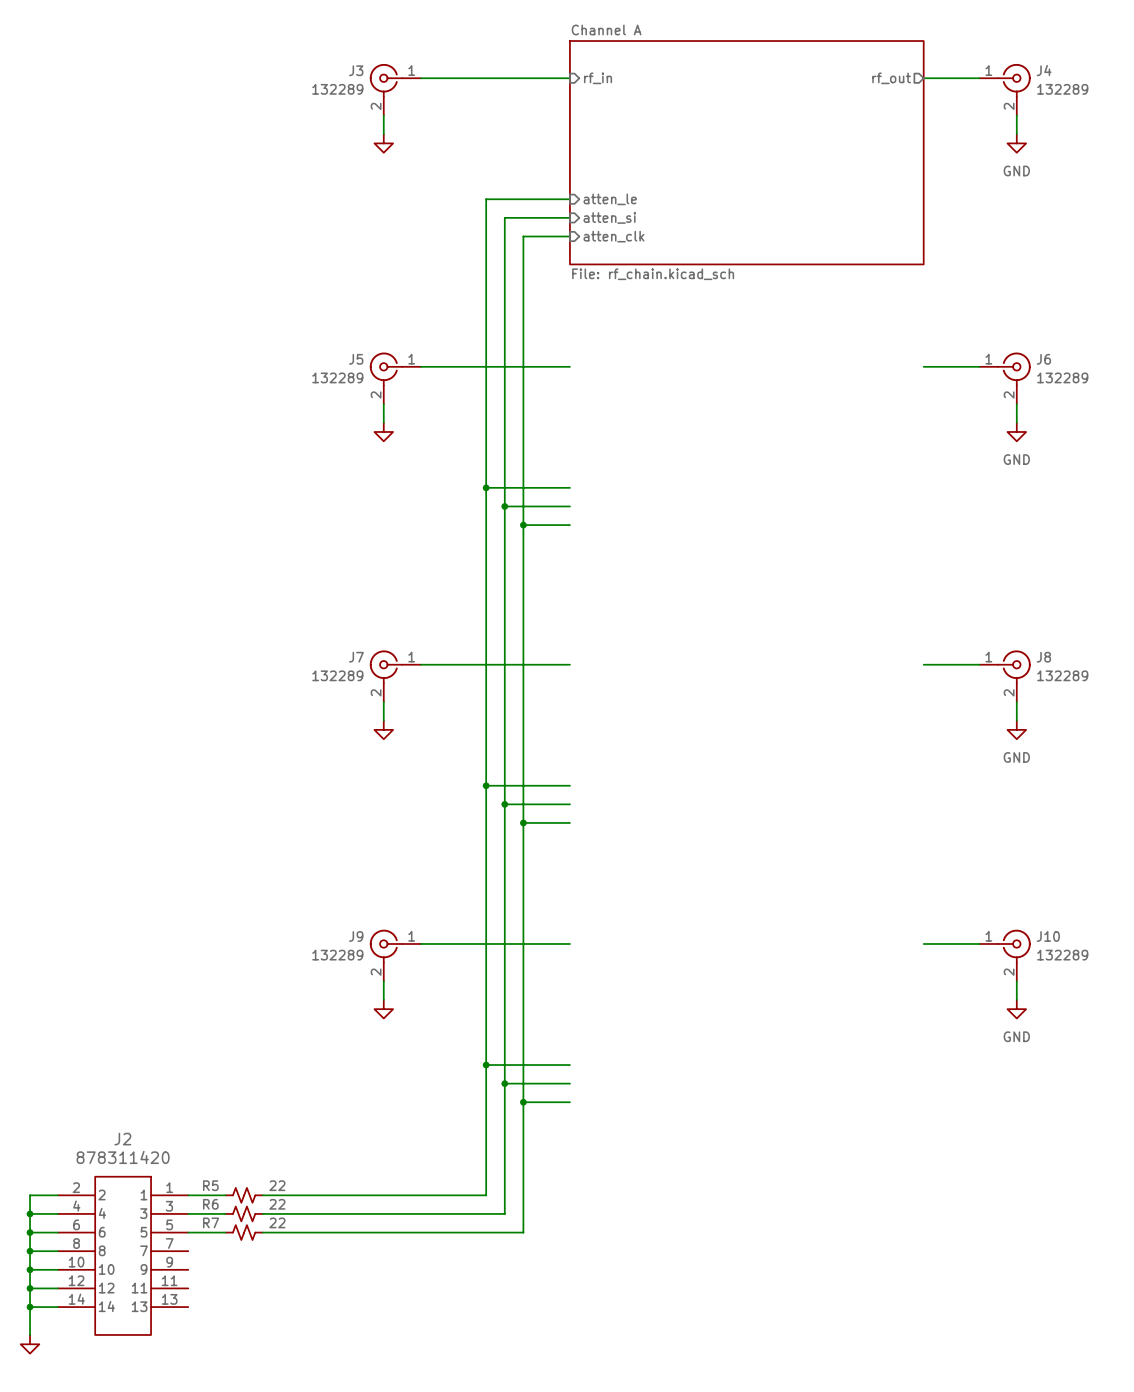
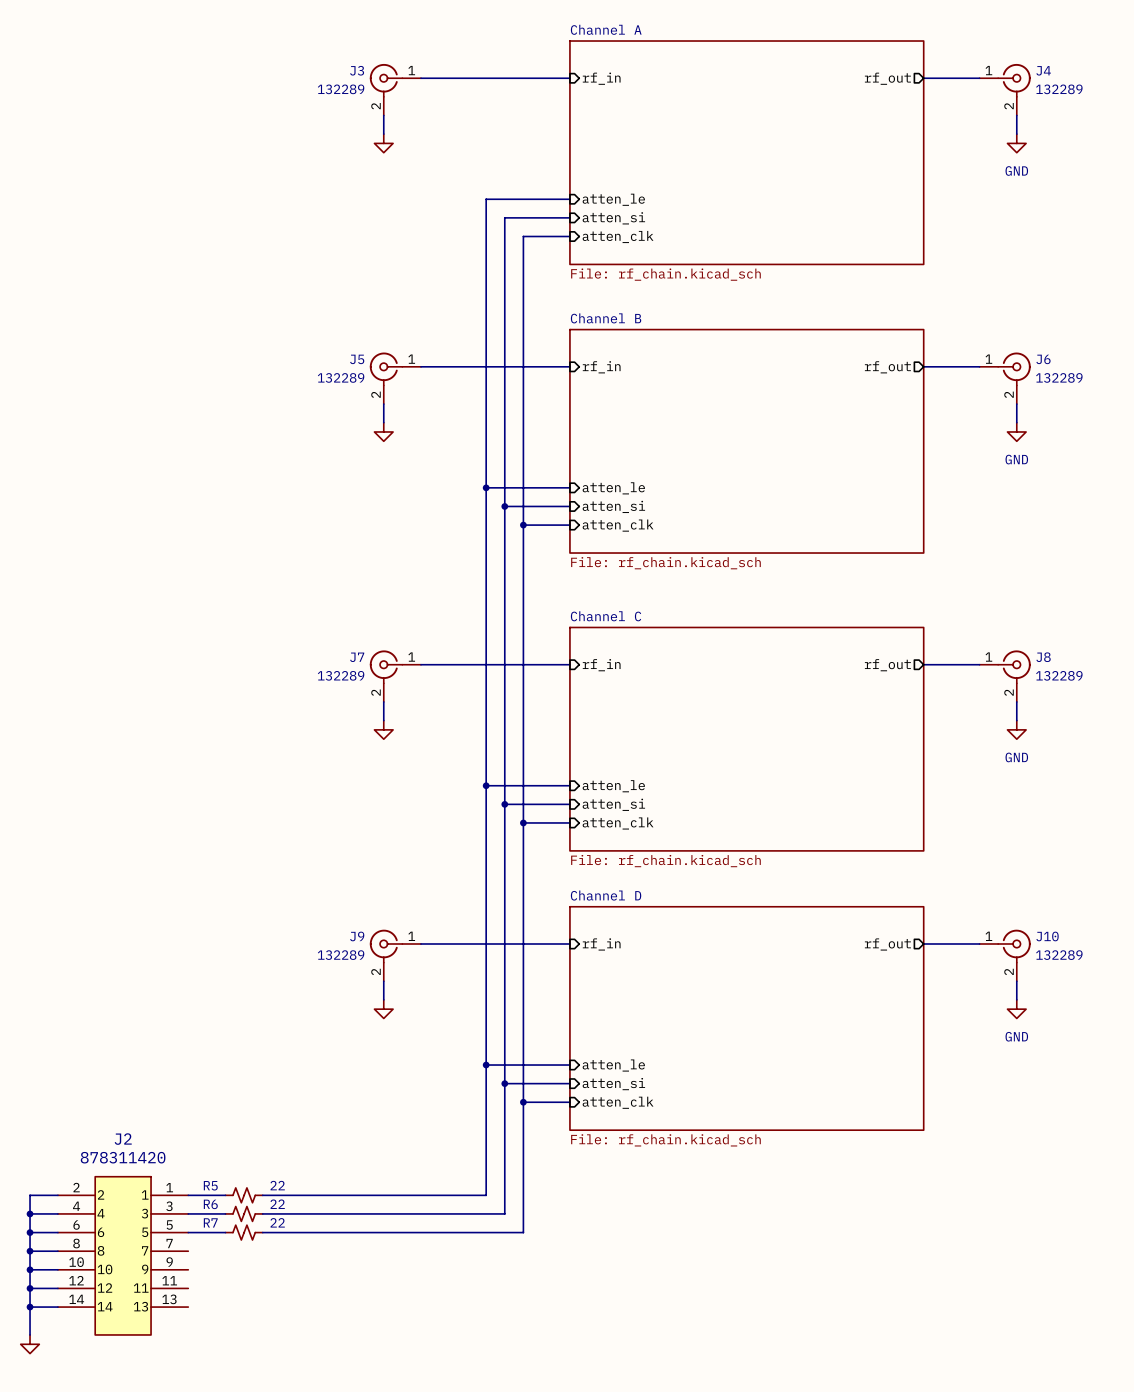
sheet pin: none -> rf_in (601, 367)
sheet pin: none -> rf_out (887, 367)
sheet Channel B: none -> File: rf_chain.kicad_sch (746, 441)
sheet pin: none -> atten_le (613, 488)
sheet pin: none -> atten_si (613, 506)
sheet pin: none -> atten_clk (618, 525)
sheet pin: none -> rf_in (601, 665)
sheet pin: none -> rf_out (887, 665)
sheet Channel C: none -> File: rf_chain.kicad_sch (746, 739)
sheet pin: none -> atten_le (613, 786)
sheet pin: none -> atten_si (613, 804)
sheet pin: none -> atten_clk (618, 823)
sheet pin: none -> rf_in (601, 944)
sheet pin: none -> rf_out (887, 944)
sheet Channel D: none -> File: rf_chain.kicad_sch (746, 1018)
sheet pin: none -> atten_le (613, 1065)
sheet pin: none -> atten_si (613, 1084)
sheet pin: none -> atten_clk (618, 1102)

